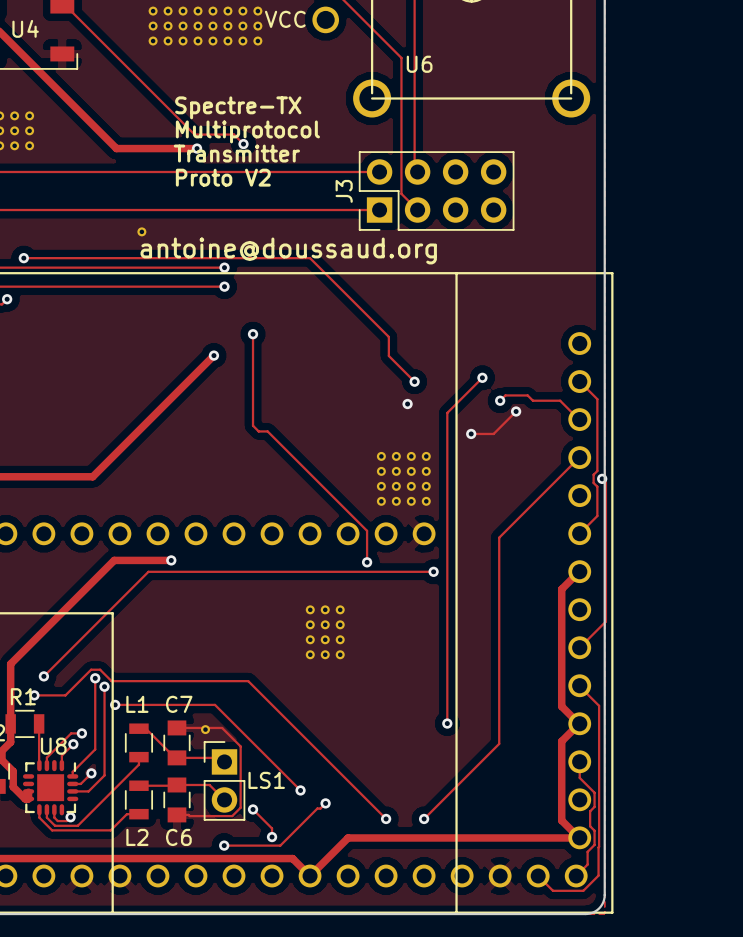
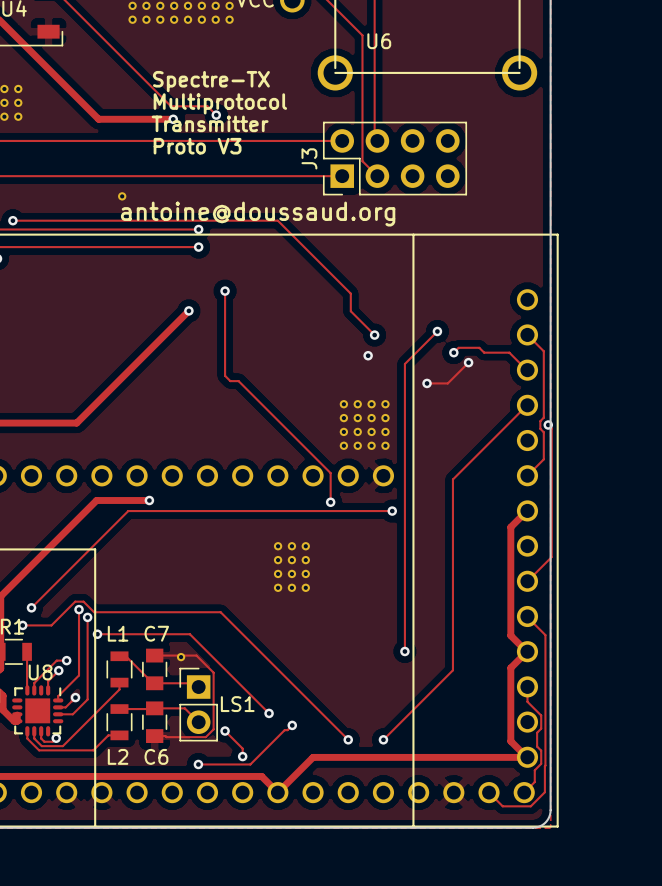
text: Proto V2 (223, 177) -> Proto V3 (197, 146)

